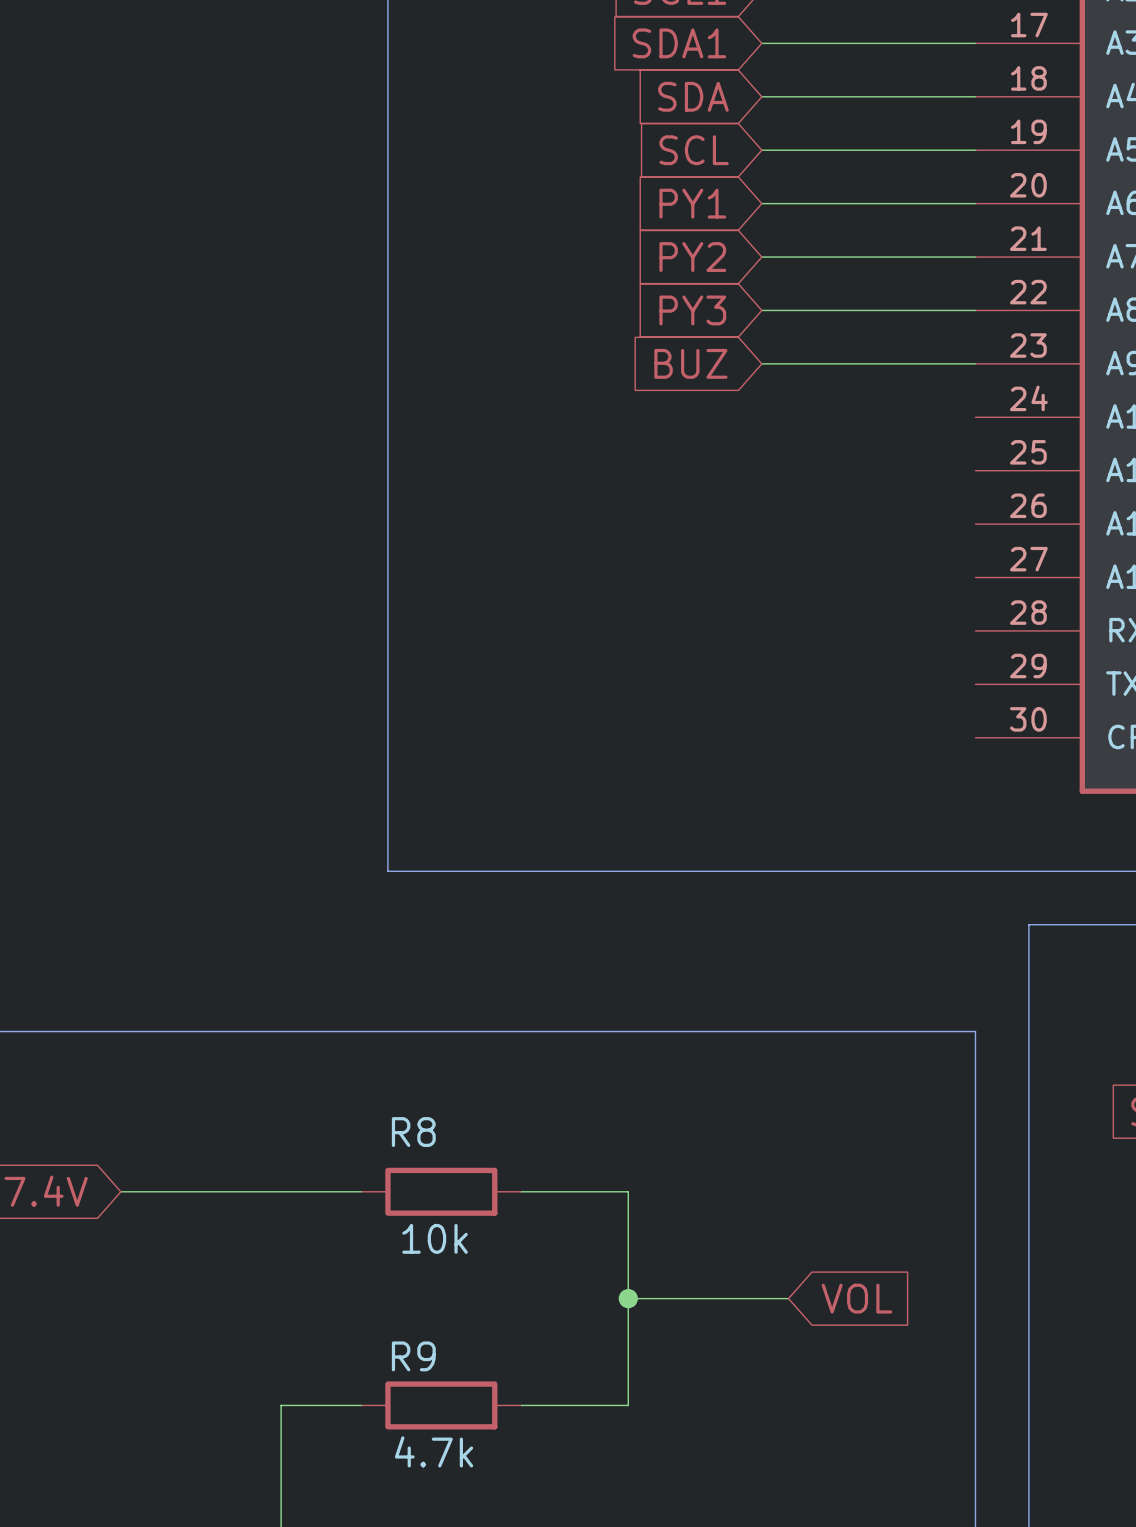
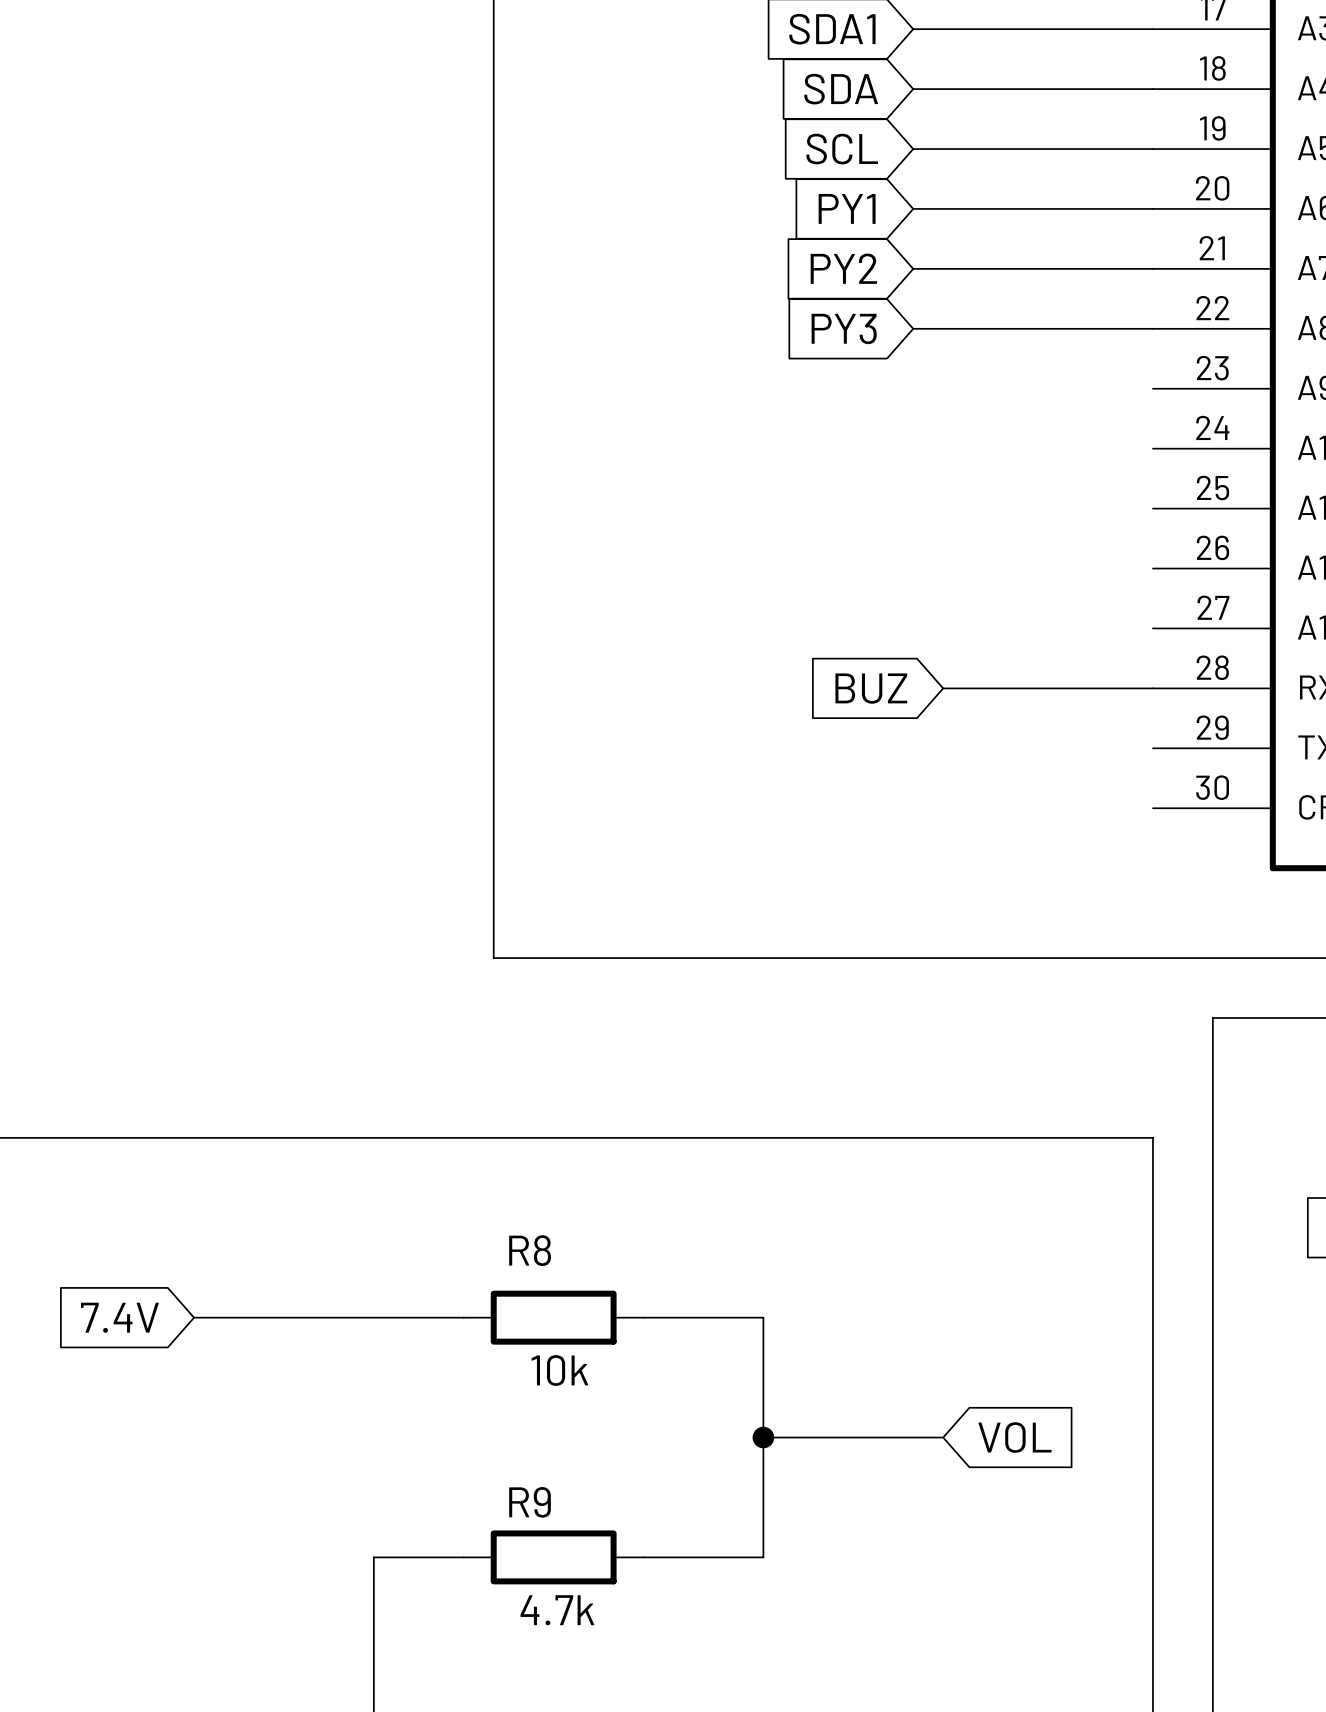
global label position: BUZ (690, 363) -> BUZ (871, 688)
wire: (761, 363) (975, 363) -> none
wire: none -> (943, 688) (1152, 688)

